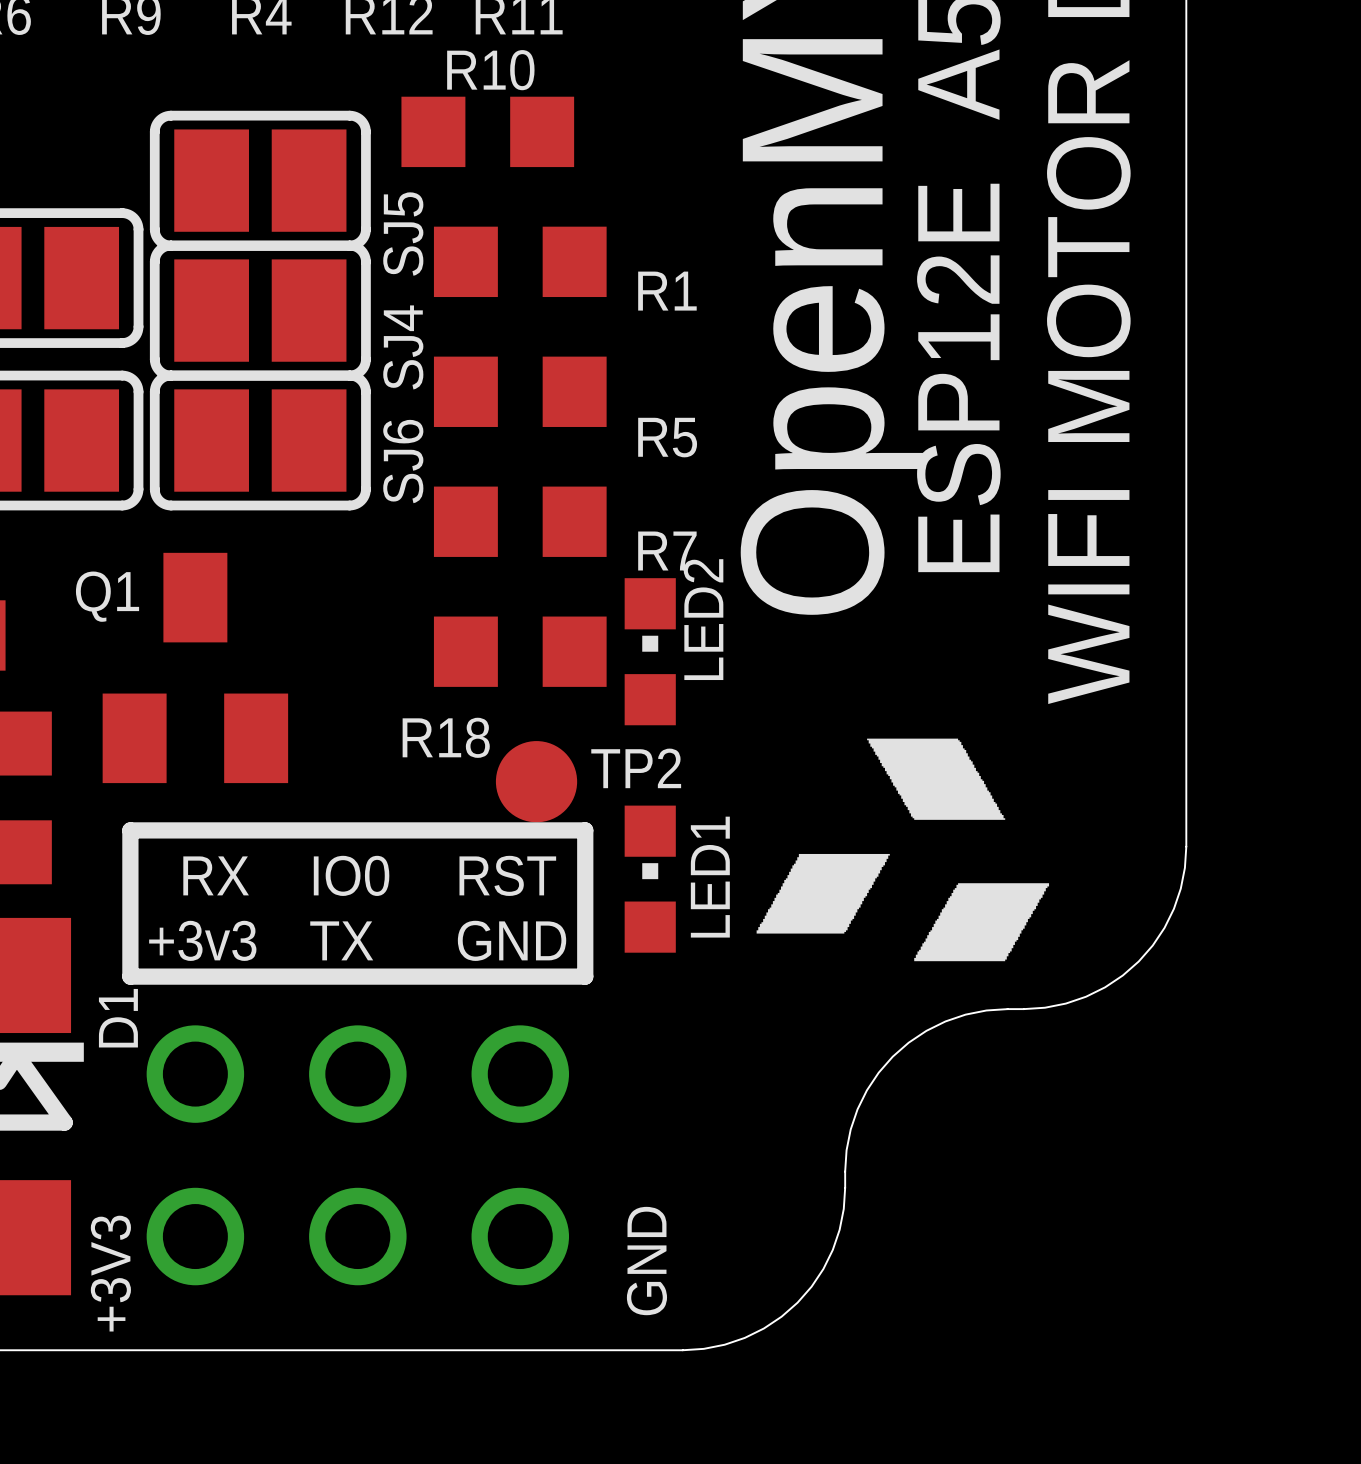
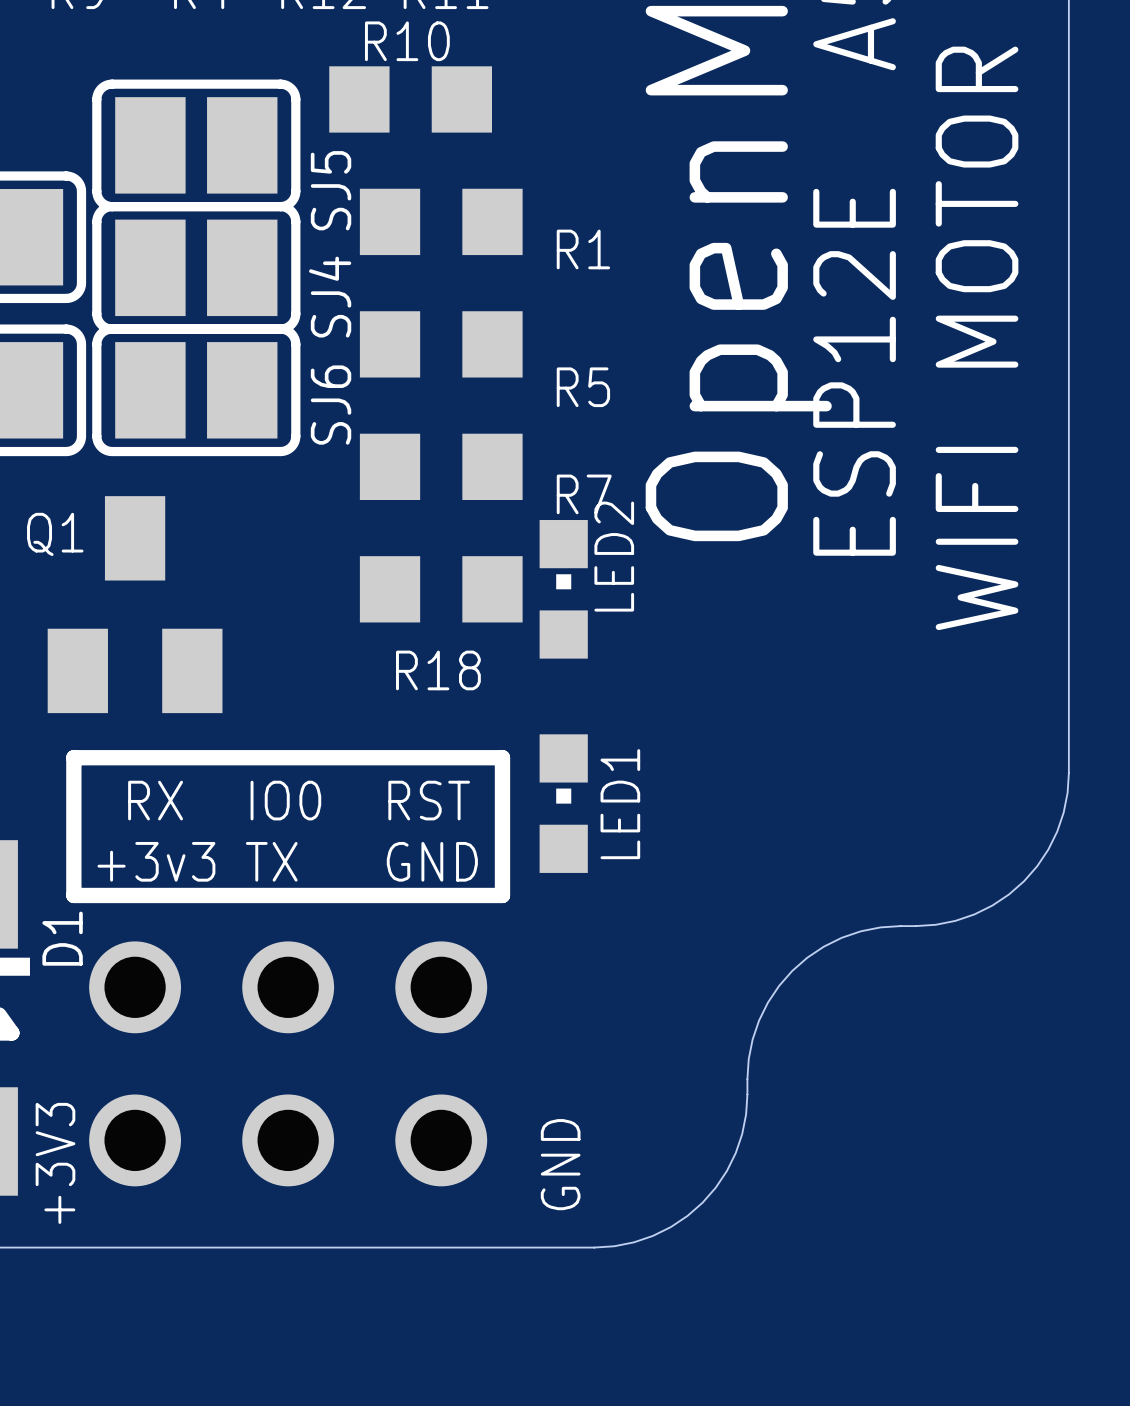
R18 name position: R18 (446, 737) -> R18 (438, 670)
drawing: [756, 738, 1050, 962] -> none
TP2: (536, 781) -> none

